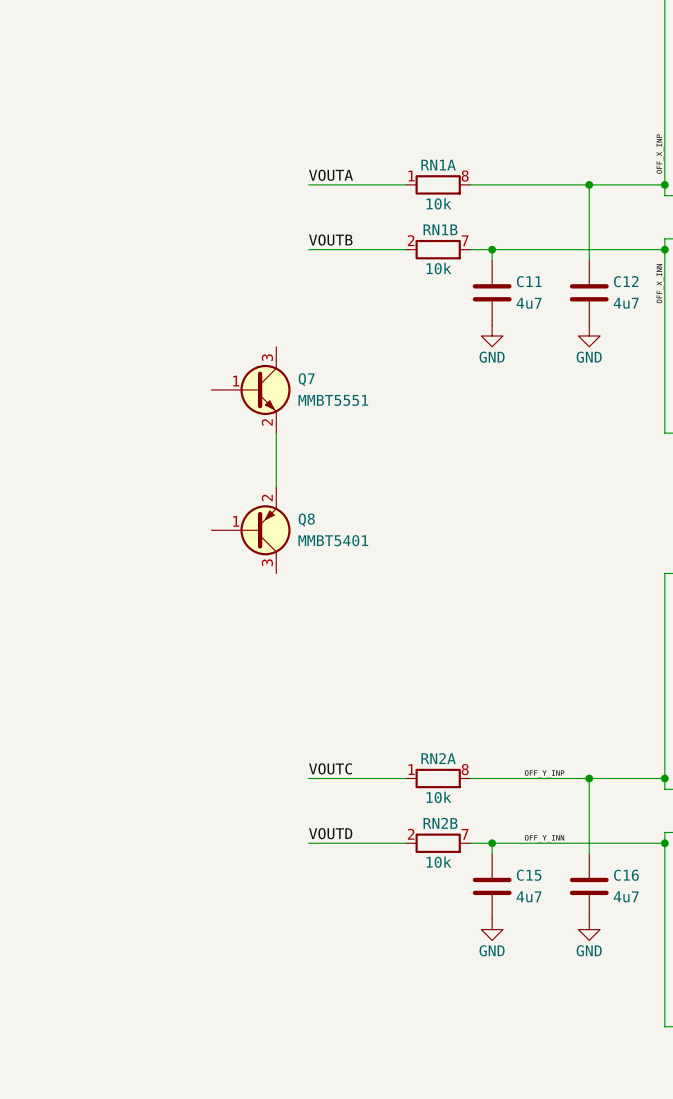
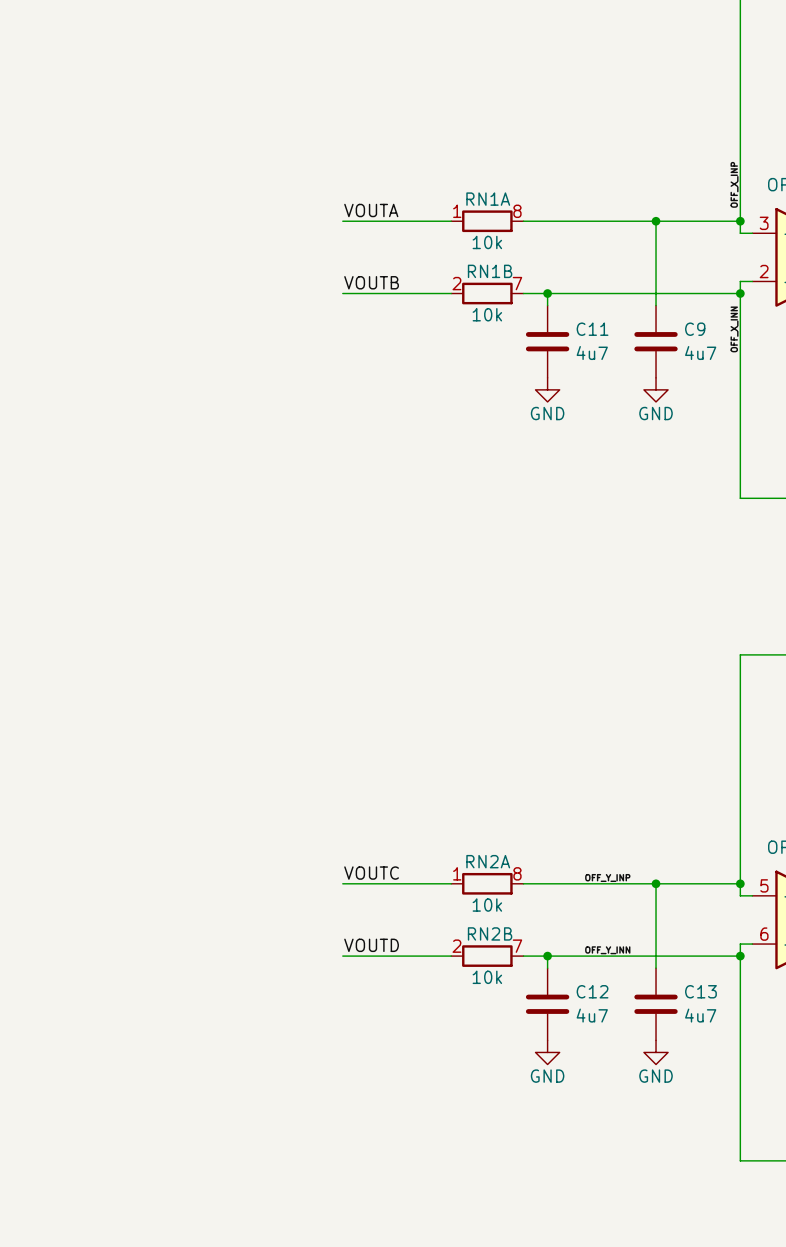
C12 name: C12 (626, 281) -> C9 (695, 329)
Q7: MMBT5551 (251, 389) -> none
wire: (276, 433) (276, 487) -> none
Q8: MMBT5401 (251, 530) -> none
C15 name: C15 (529, 875) -> C12 (592, 991)
C16 name: C16 (626, 875) -> C13 (700, 991)

